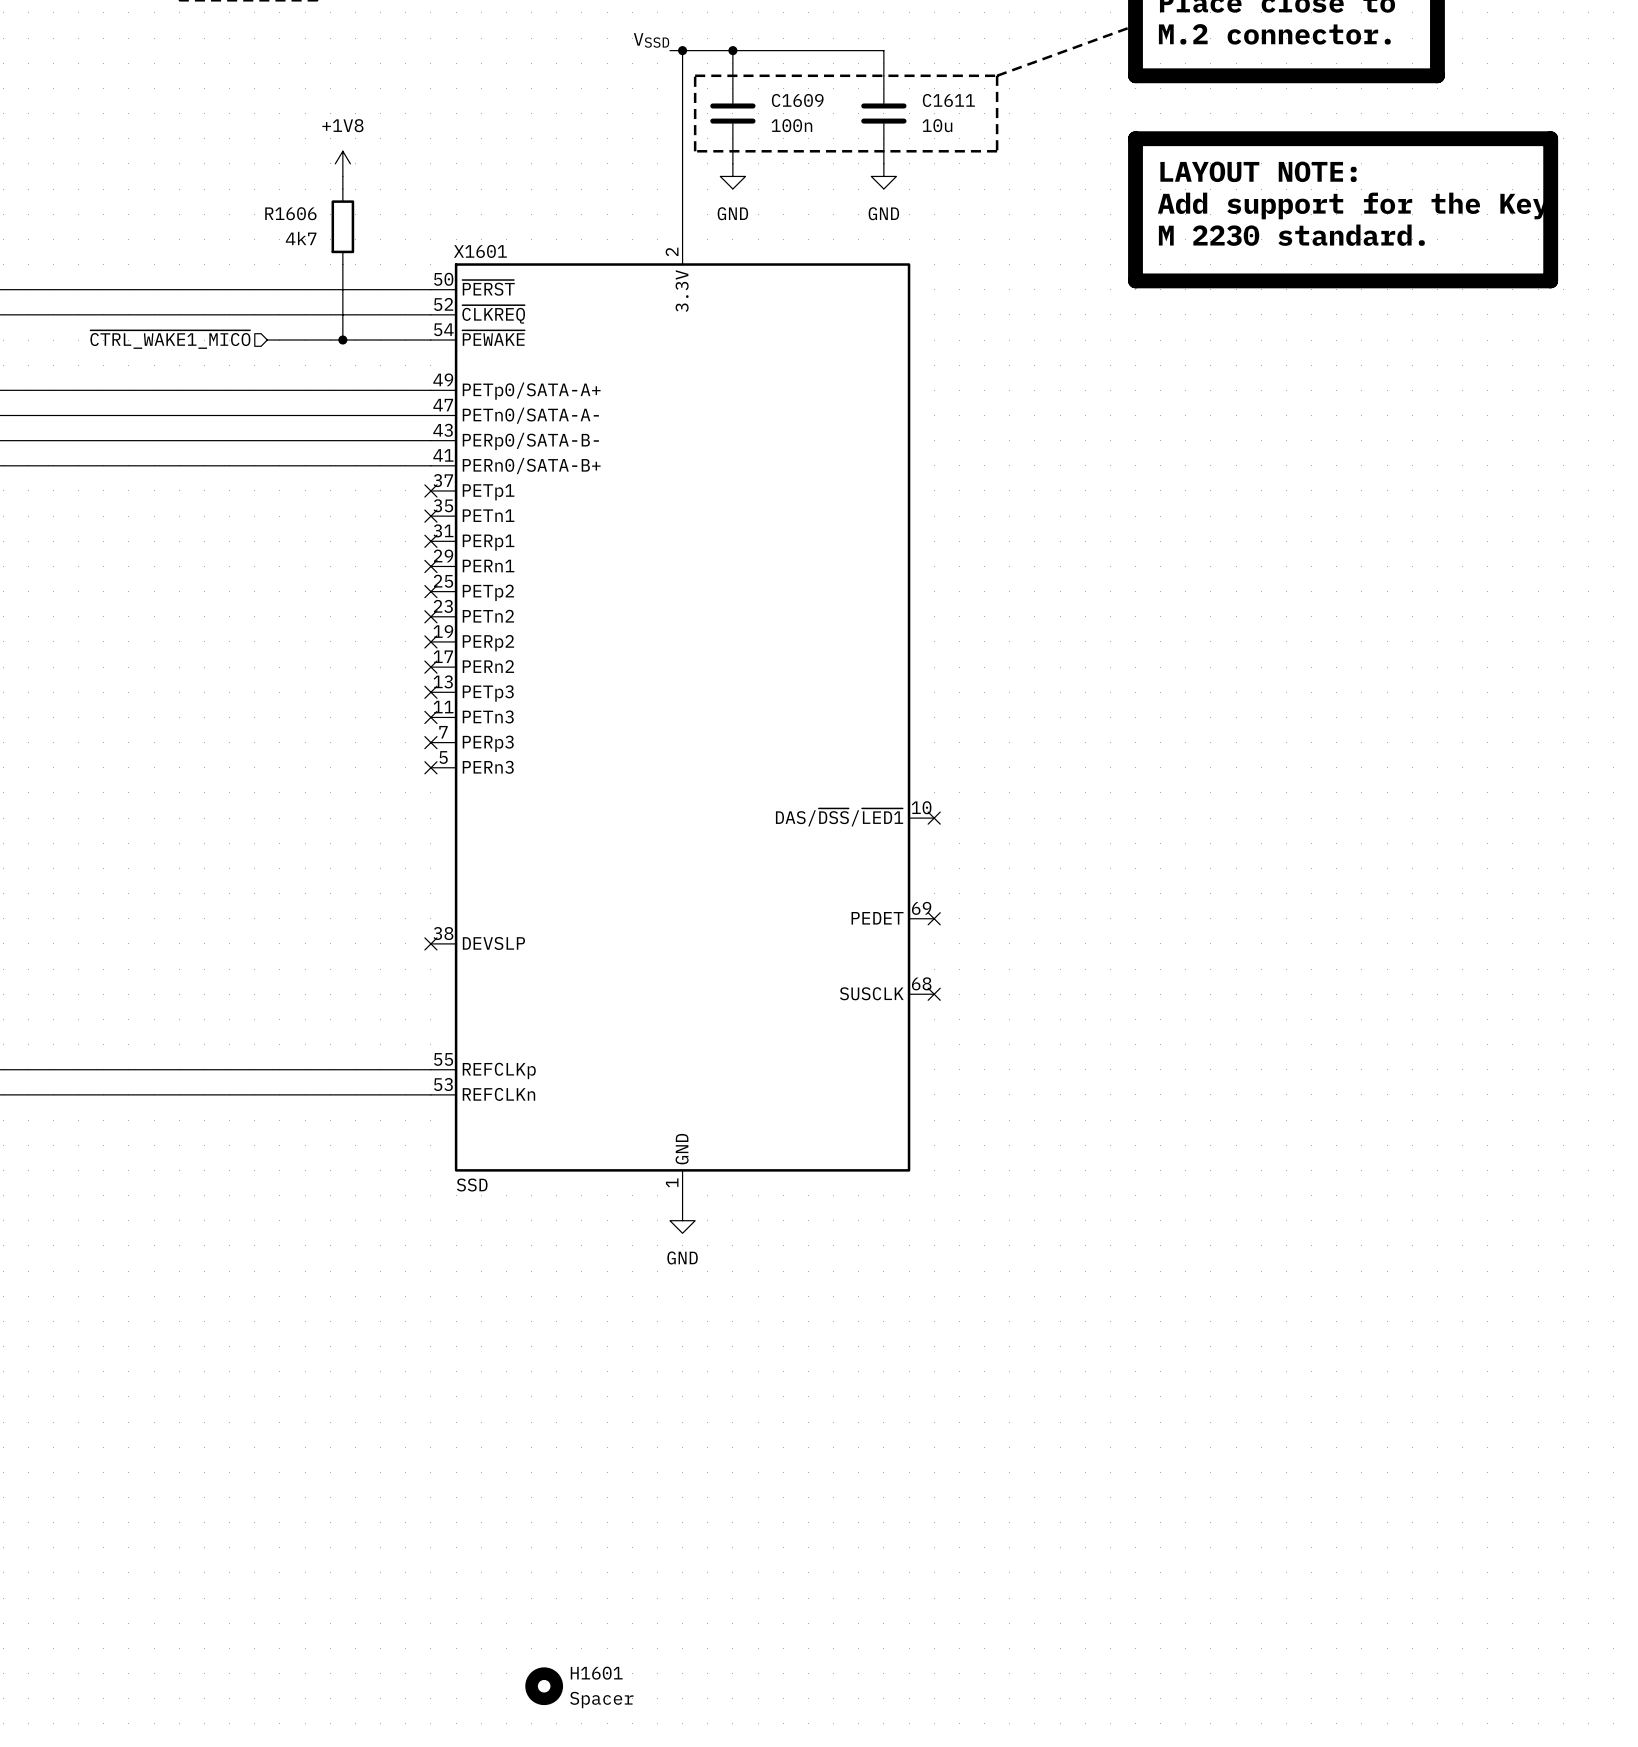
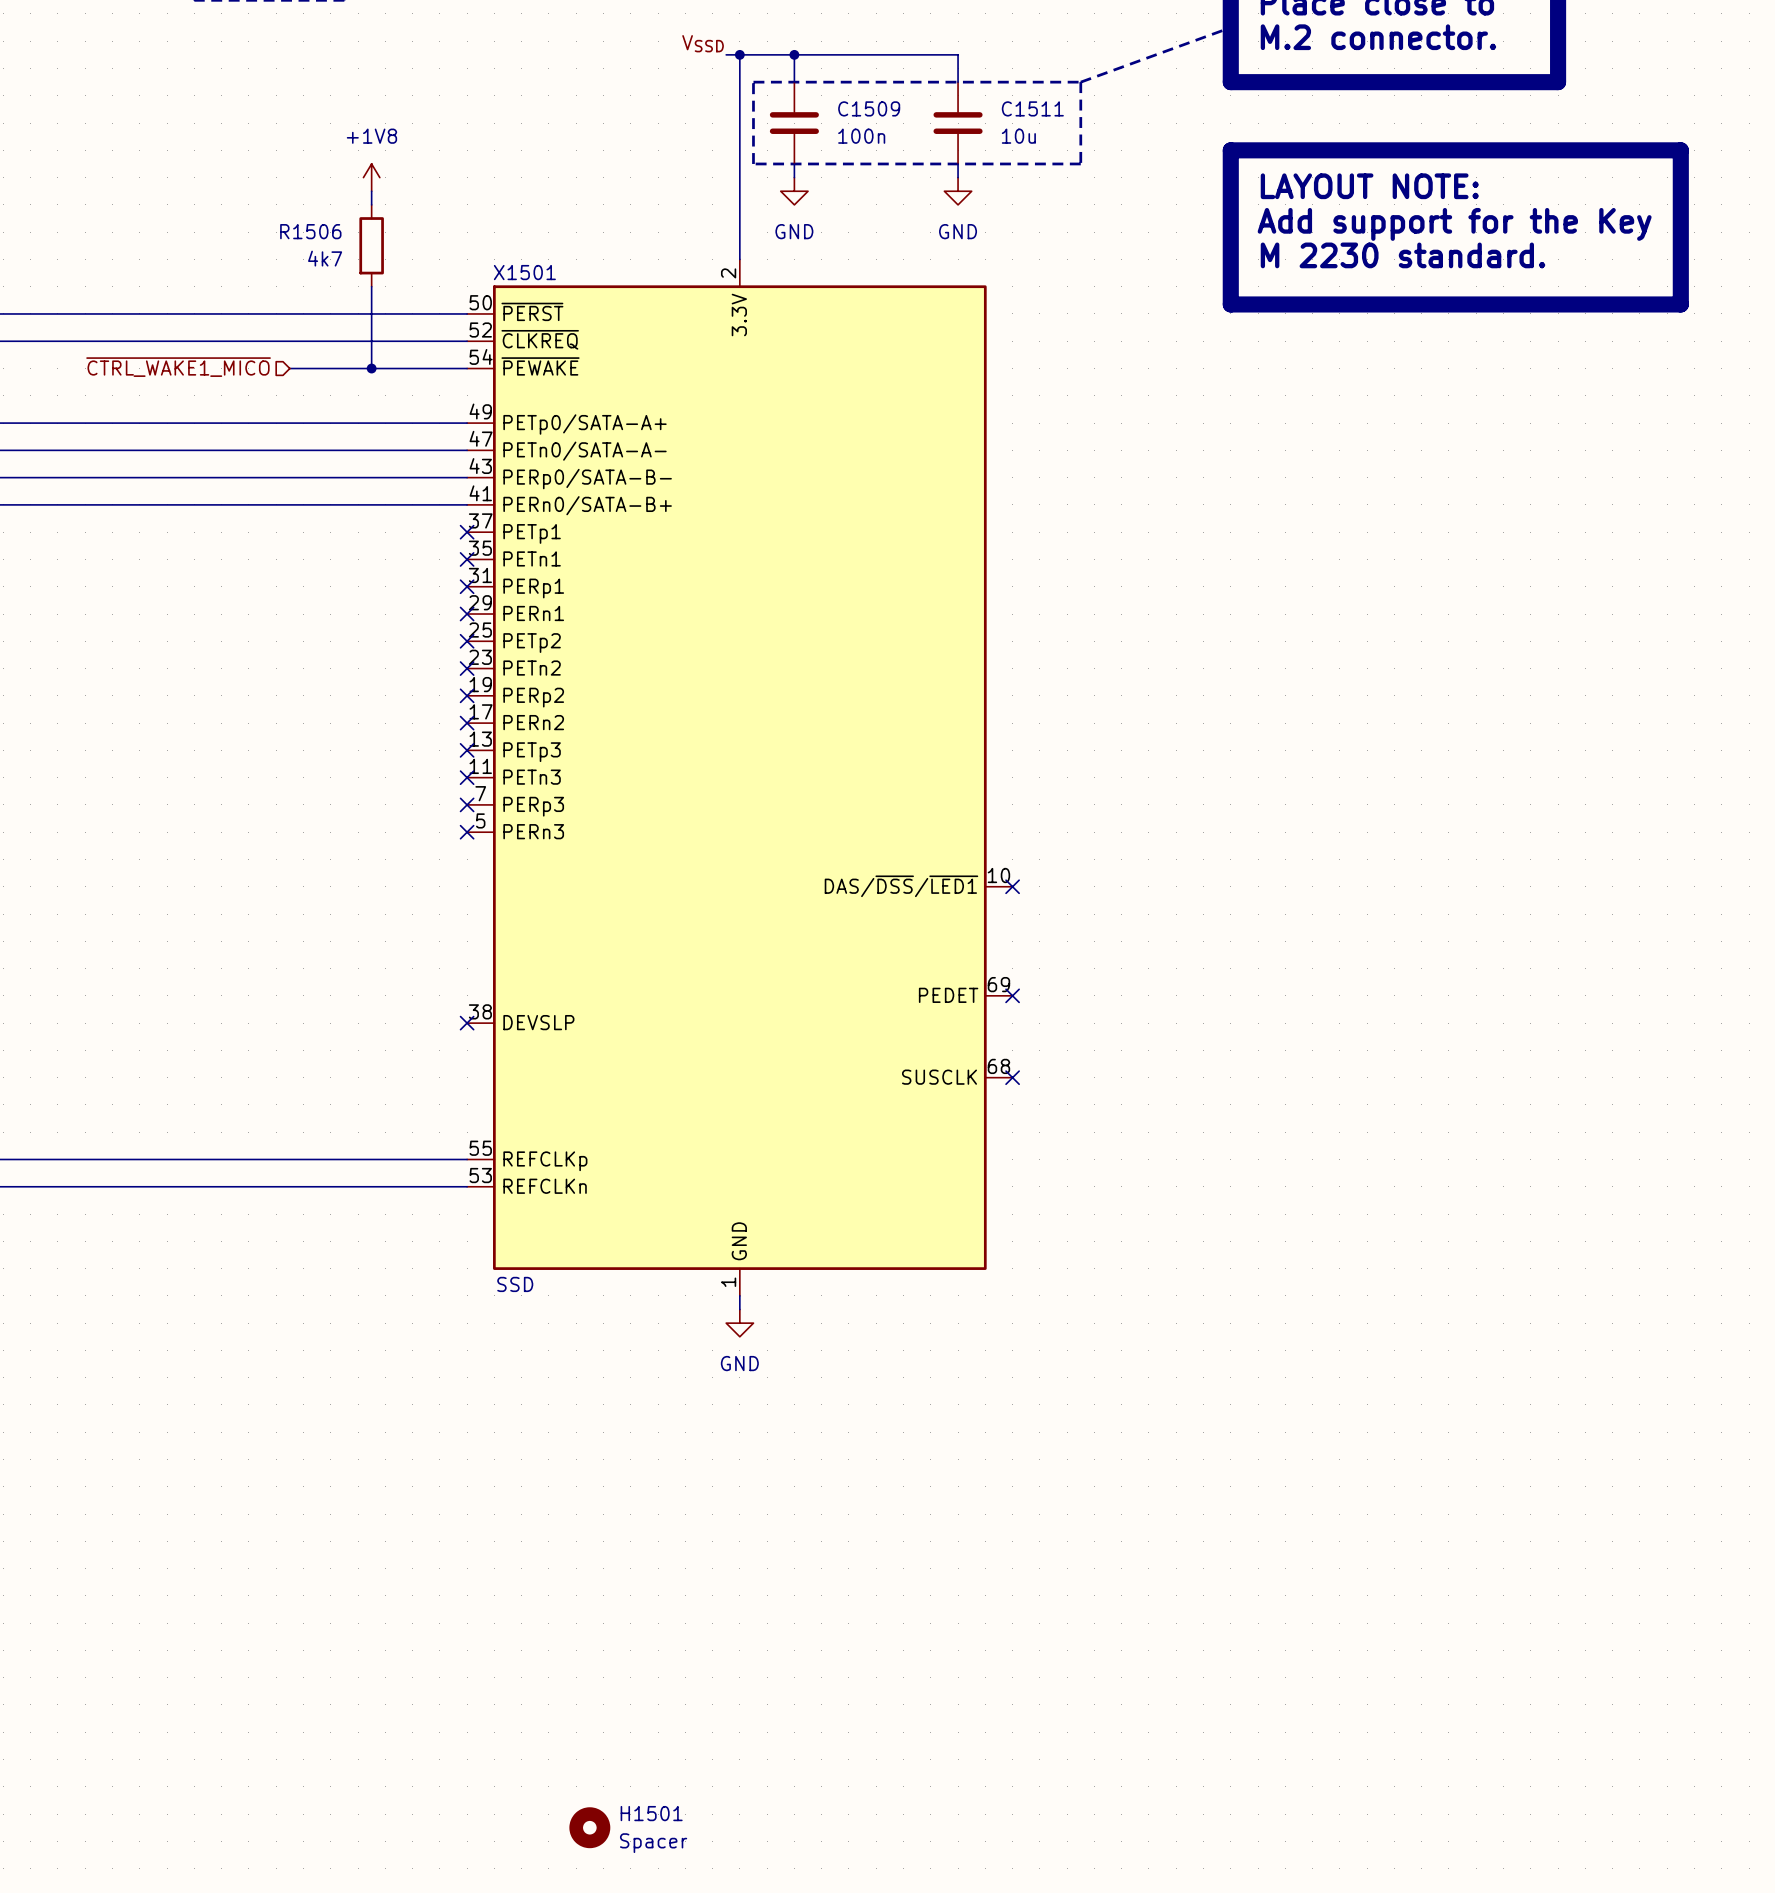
C1609 name: C1609 (797, 100) -> C1509 (869, 108)
C1611 name: C1611 (948, 100) -> C1511 (1032, 108)
R1606 name: R1606 (290, 213) -> R1506 (310, 231)
X1601 name: X1601 (480, 251) -> X1501 (524, 272)
H1601 name: H1601 (596, 1673) -> H1501 (651, 1813)

